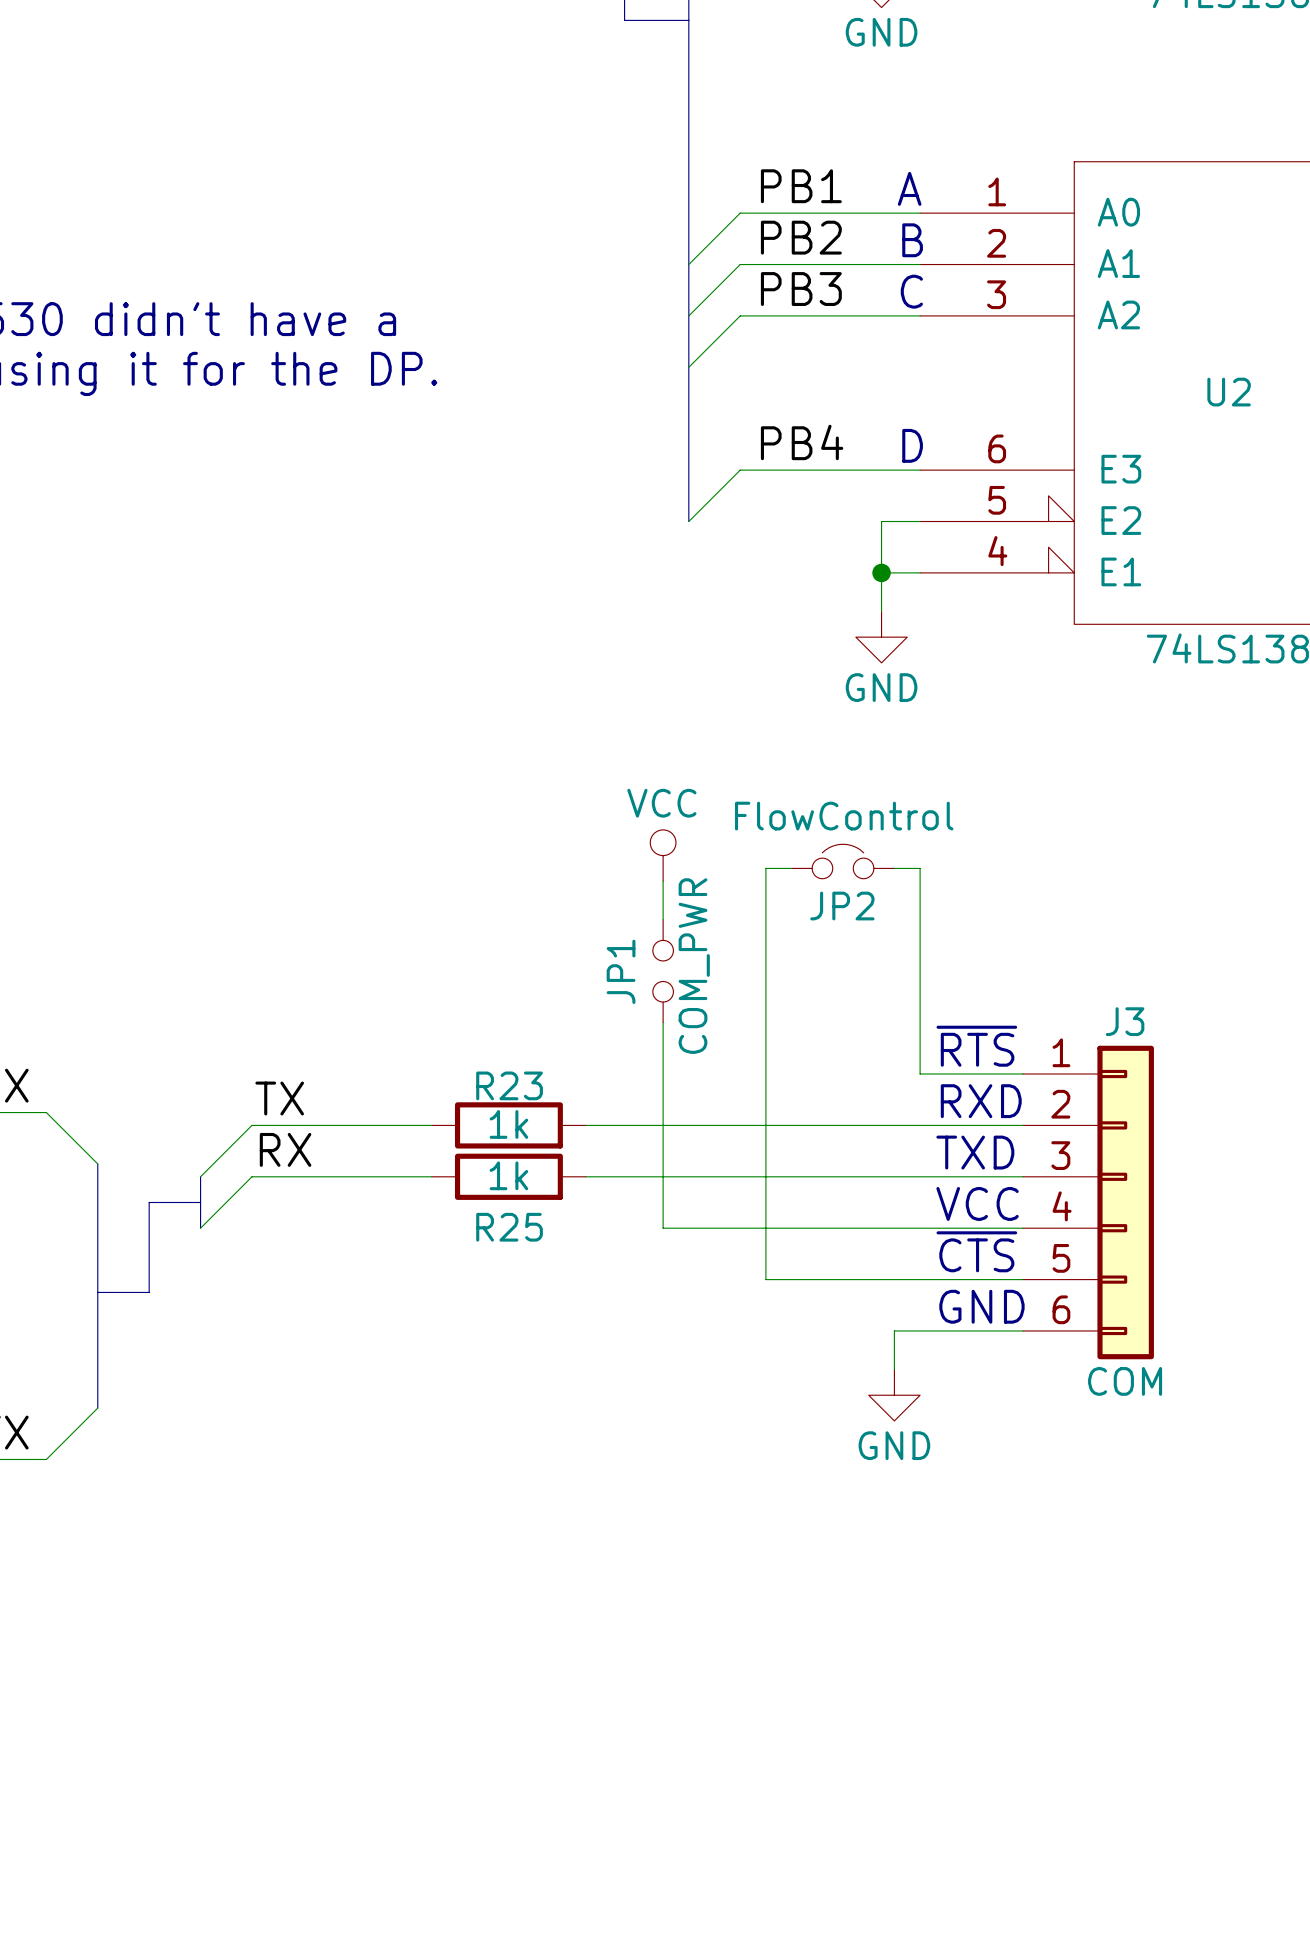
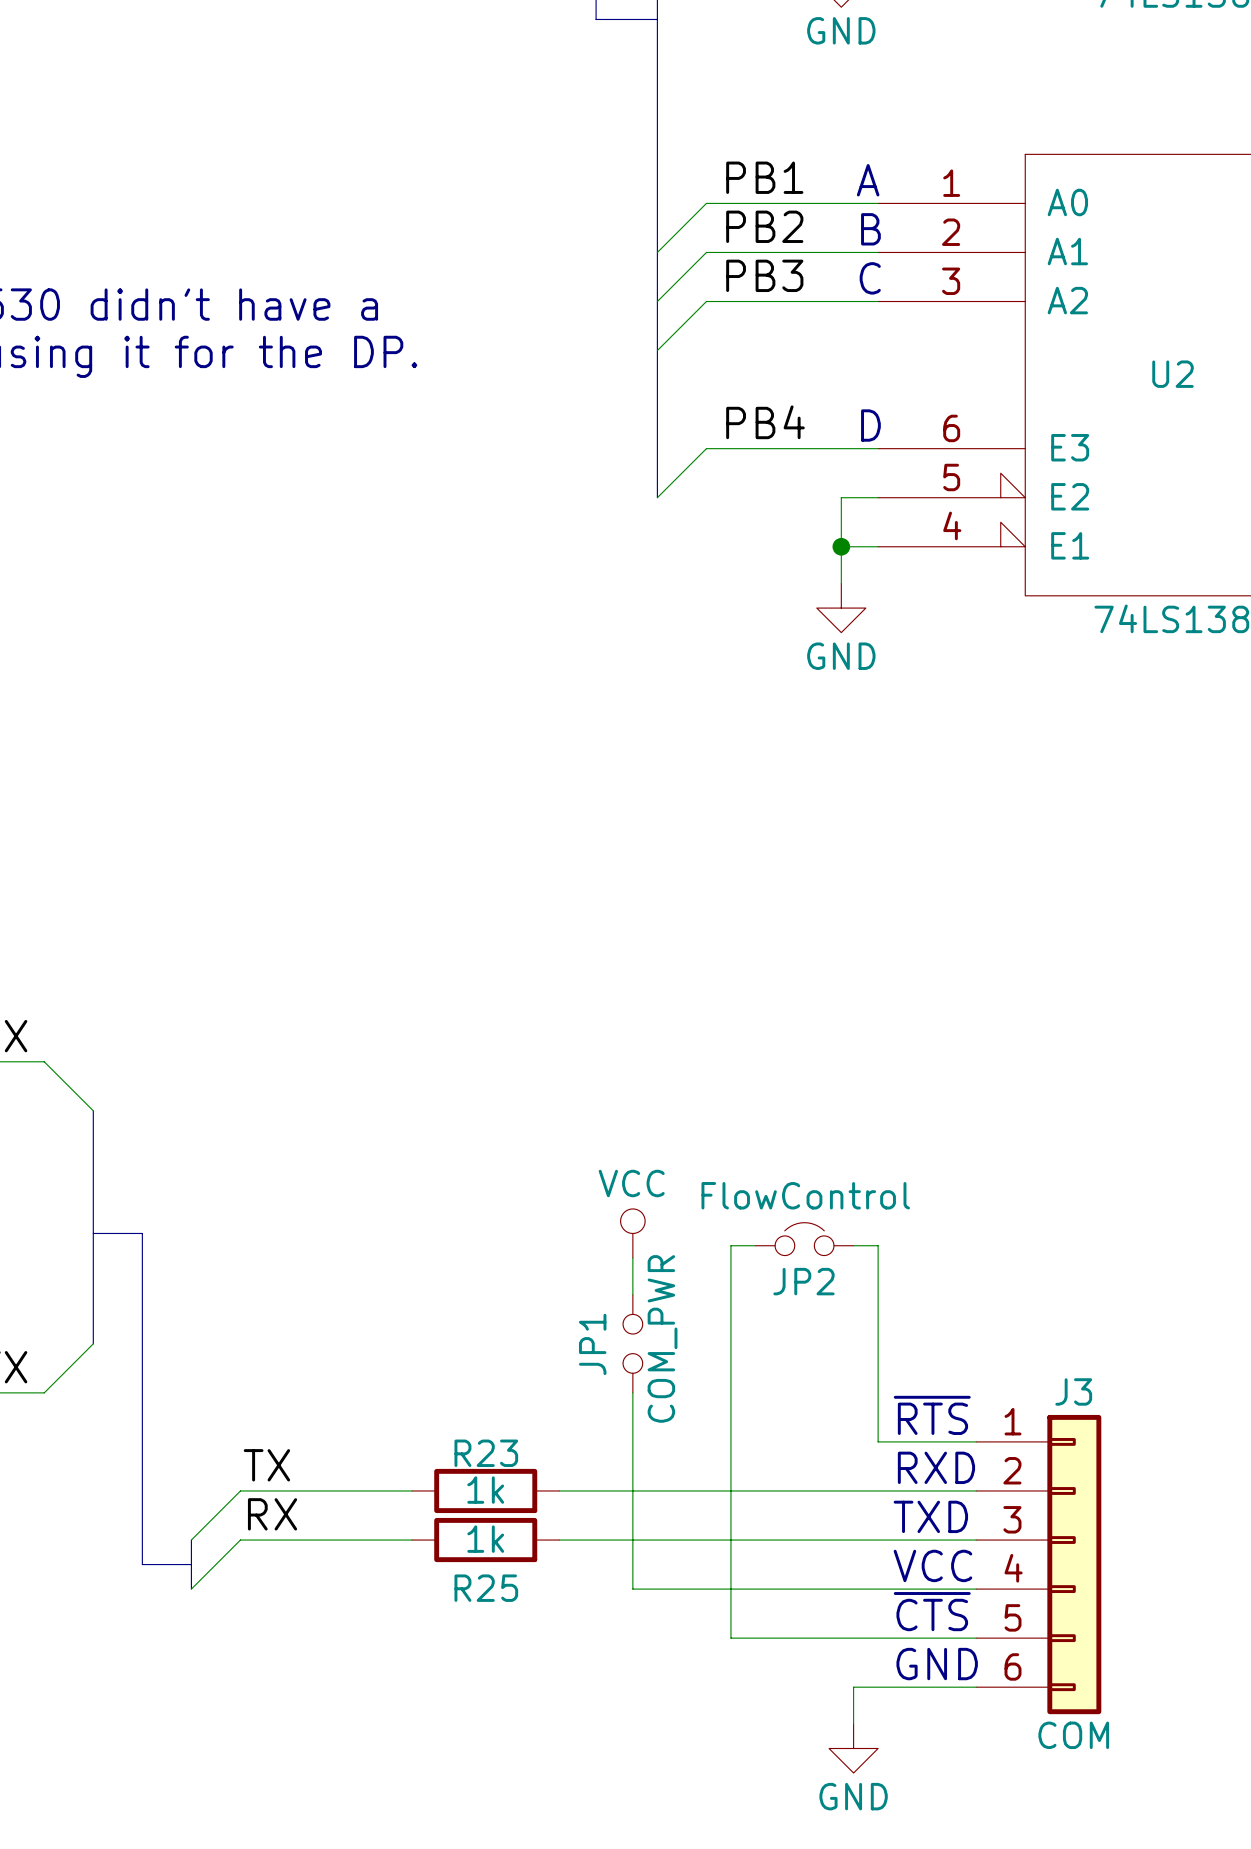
power symbol position: VCC (663, 855) -> VCC (632, 1233)
JP2 position: (843, 861) -> (804, 1239)
wire: (791, 868) (765, 868) (765, 1279) (1022, 1279) -> (755, 1245) (730, 1245) (730, 1638) (976, 1638)
wire: (894, 868) (920, 868) (920, 1074) (1022, 1074) -> (853, 1245) (878, 1245) (878, 1441) (976, 1441)
wire: (663, 881) (663, 919) -> (632, 1257) (632, 1294)
JP1 position: (663, 971) -> (632, 1343)
wire: (663, 1022) (663, 1228) (1022, 1228) -> (632, 1392) (632, 1589) (976, 1589)
text position: ~{RTS} (976, 1046) -> ~{RTS} (932, 1415)
label position: TX (279, 1098) -> TX (266, 1465)
text position: RXD (981, 1101) -> RXD (936, 1467)
wire: (431, 1125) (251, 1125) (200, 1176) -> (412, 1490) (240, 1490) (191, 1540)
R23 position: (508, 1125) -> (485, 1490)
wire: (586, 1125) (1022, 1125) -> (559, 1490) (976, 1490)
label position: RX (285, 1149) -> RX (272, 1514)
text position: TXD (975, 1152) -> TXD (930, 1516)
bus: (200, 1176) (200, 1228) -> (191, 1540) (191, 1589)
wire: (431, 1176) (251, 1176) (200, 1228) -> (412, 1540) (240, 1540) (191, 1589)
R25 position: (508, 1176) -> (485, 1540)
wire: (586, 1176) (1022, 1176) -> (559, 1540) (976, 1540)
bus: (200, 1202) (149, 1202) (149, 1292) -> (191, 1564) (142, 1564) (142, 1233)
J3 position: (1088, 1202) -> (1038, 1564)
text position: VCC (977, 1203) -> VCC (932, 1565)
text position: ~{CTS} (976, 1251) -> ~{CTS} (932, 1611)
text position: GND (981, 1306) -> GND (937, 1664)
wire: (1022, 1330) (894, 1330) (894, 1369) -> (976, 1687) (853, 1687) (853, 1723)
power symbol position: GND (894, 1395) -> GND (853, 1748)

